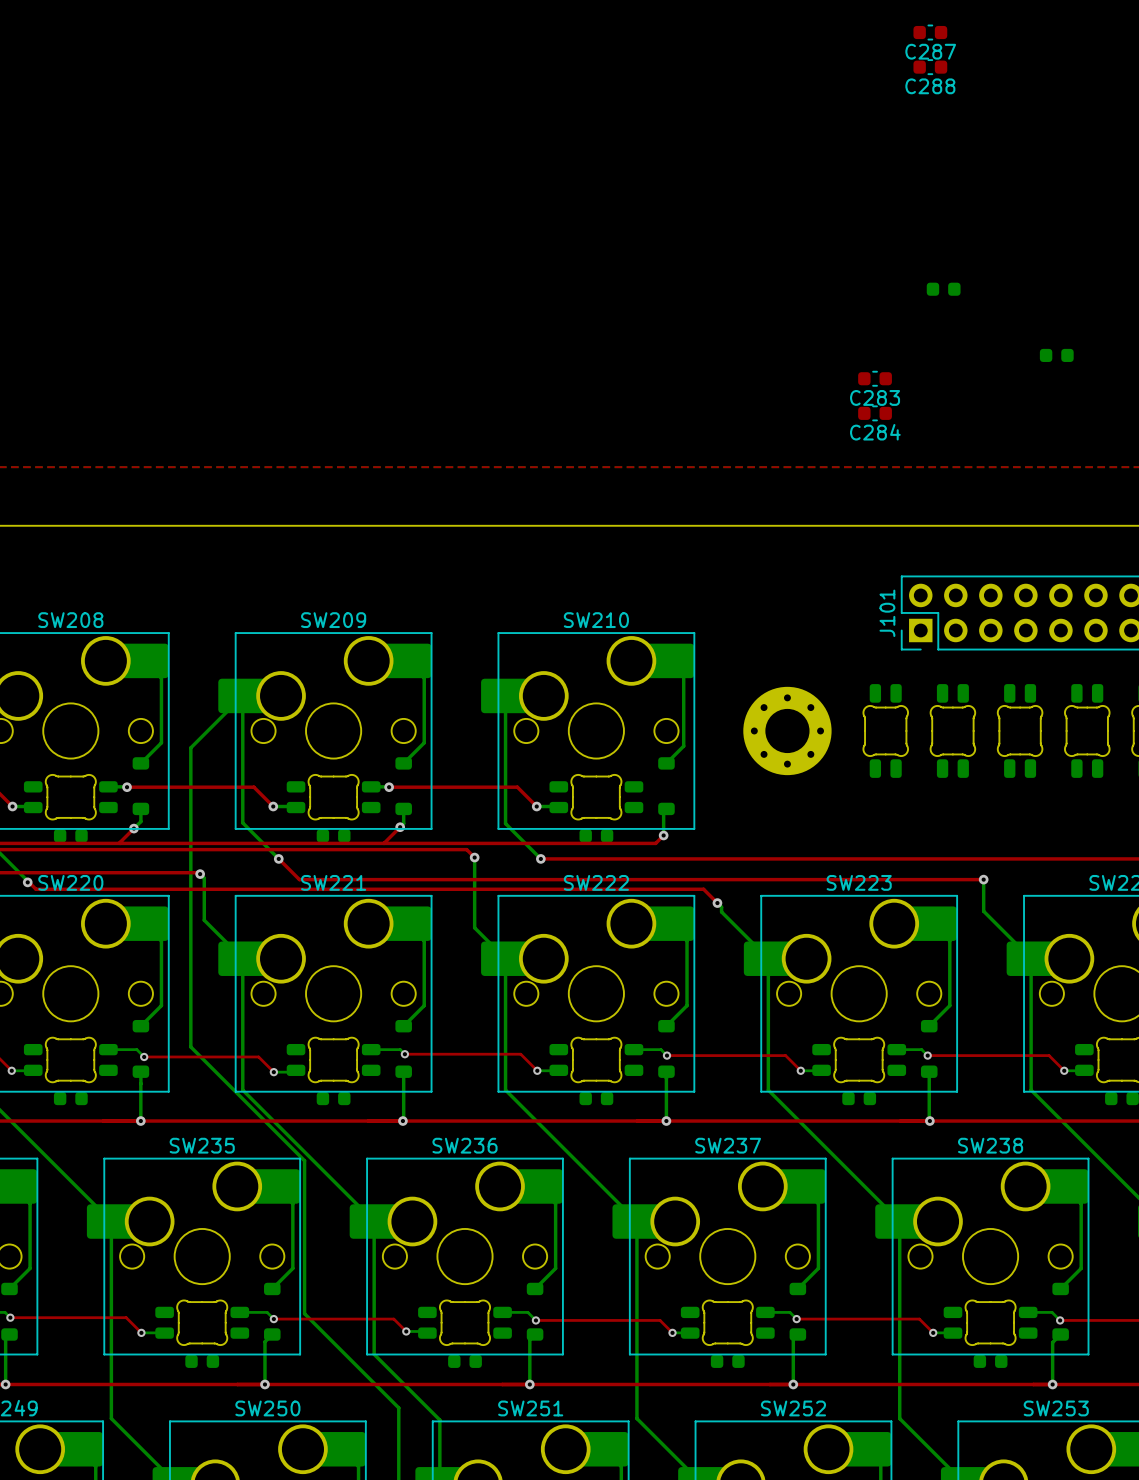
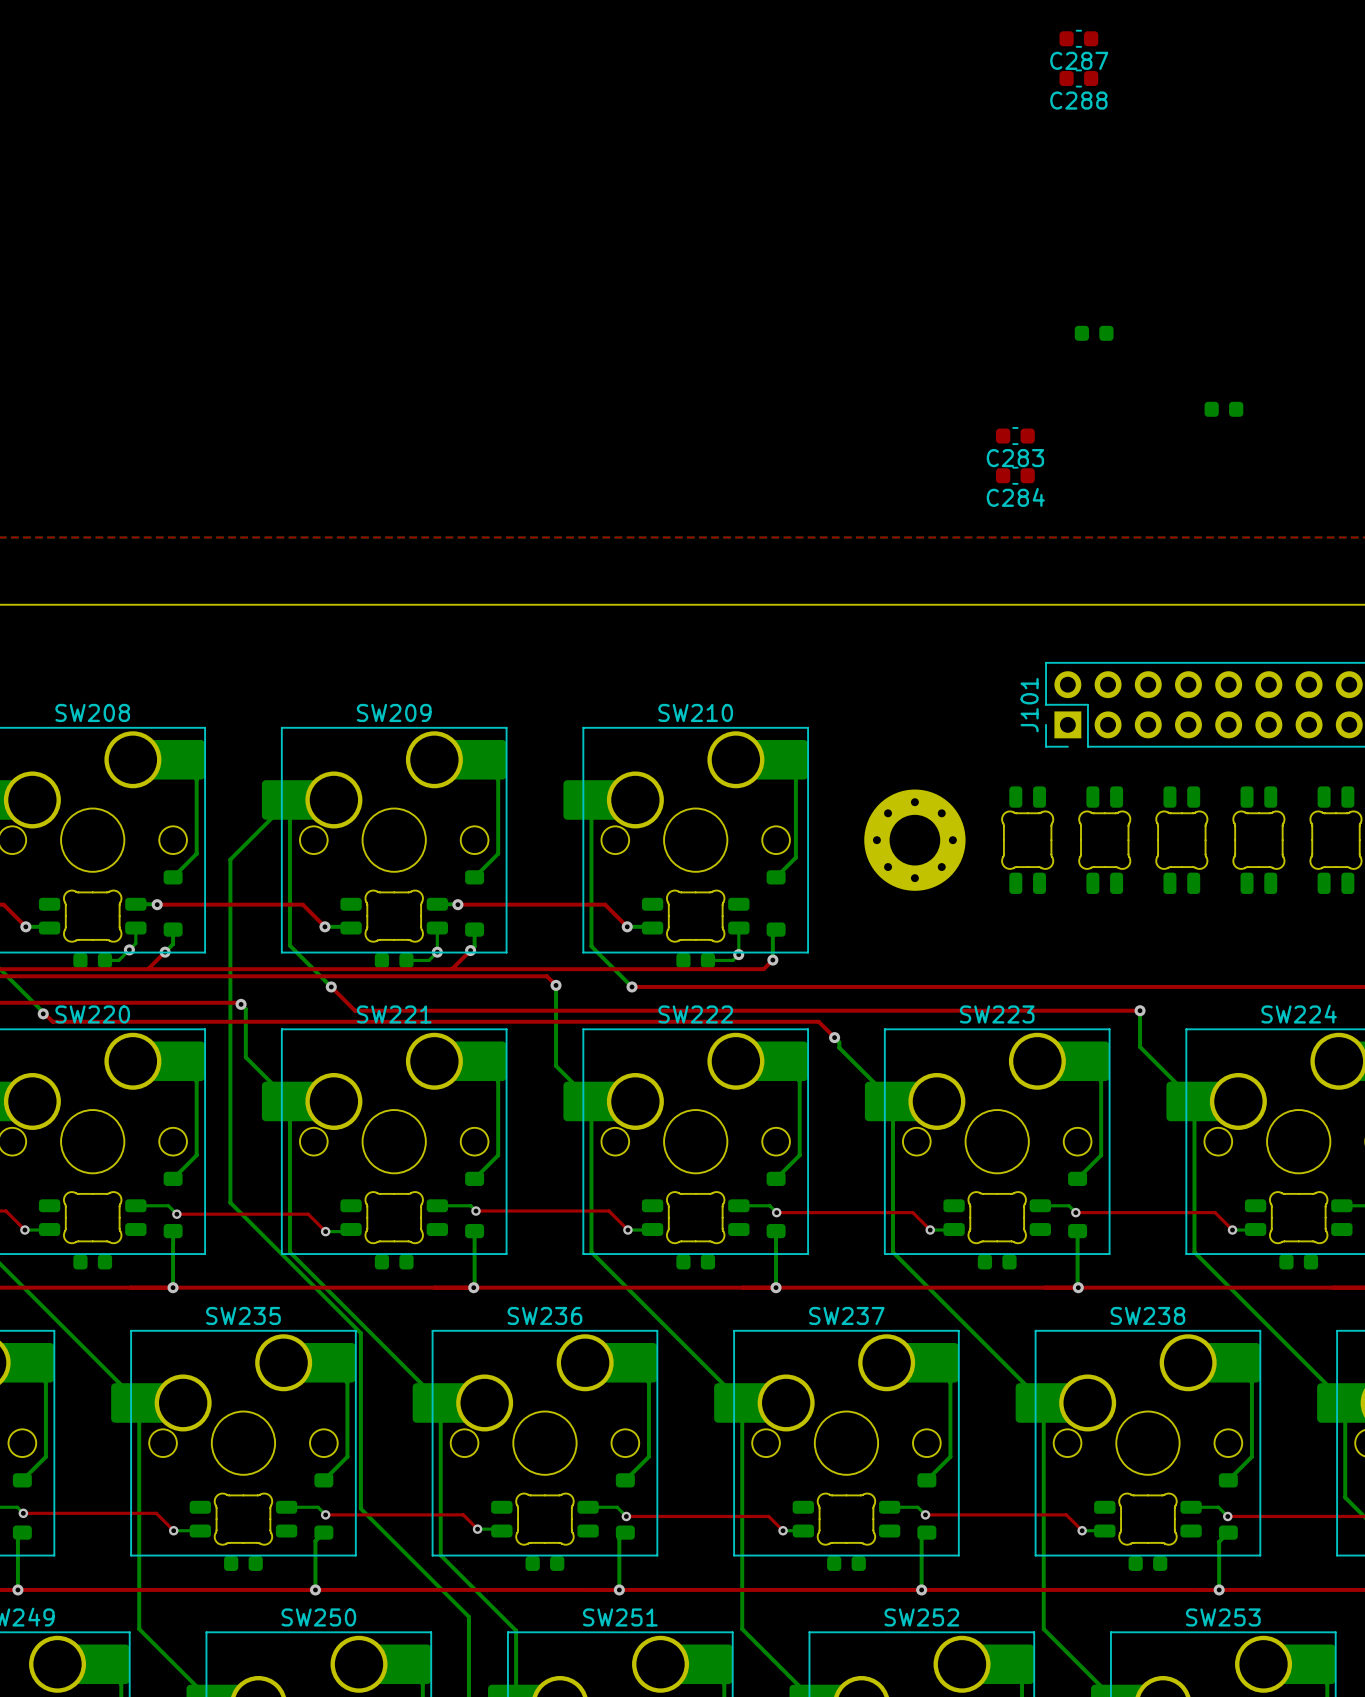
bottom track: none -> (135, 928) (135, 943) (118, 960) (104, 960)
bottom track: none -> (437, 928) (437, 952) (429, 960) (406, 960)
bottom track: none -> (738, 928) (738, 954) (732, 960) (707, 960)
via: none -> (129, 949)
via: none -> (437, 952)
via: none -> (738, 954)

